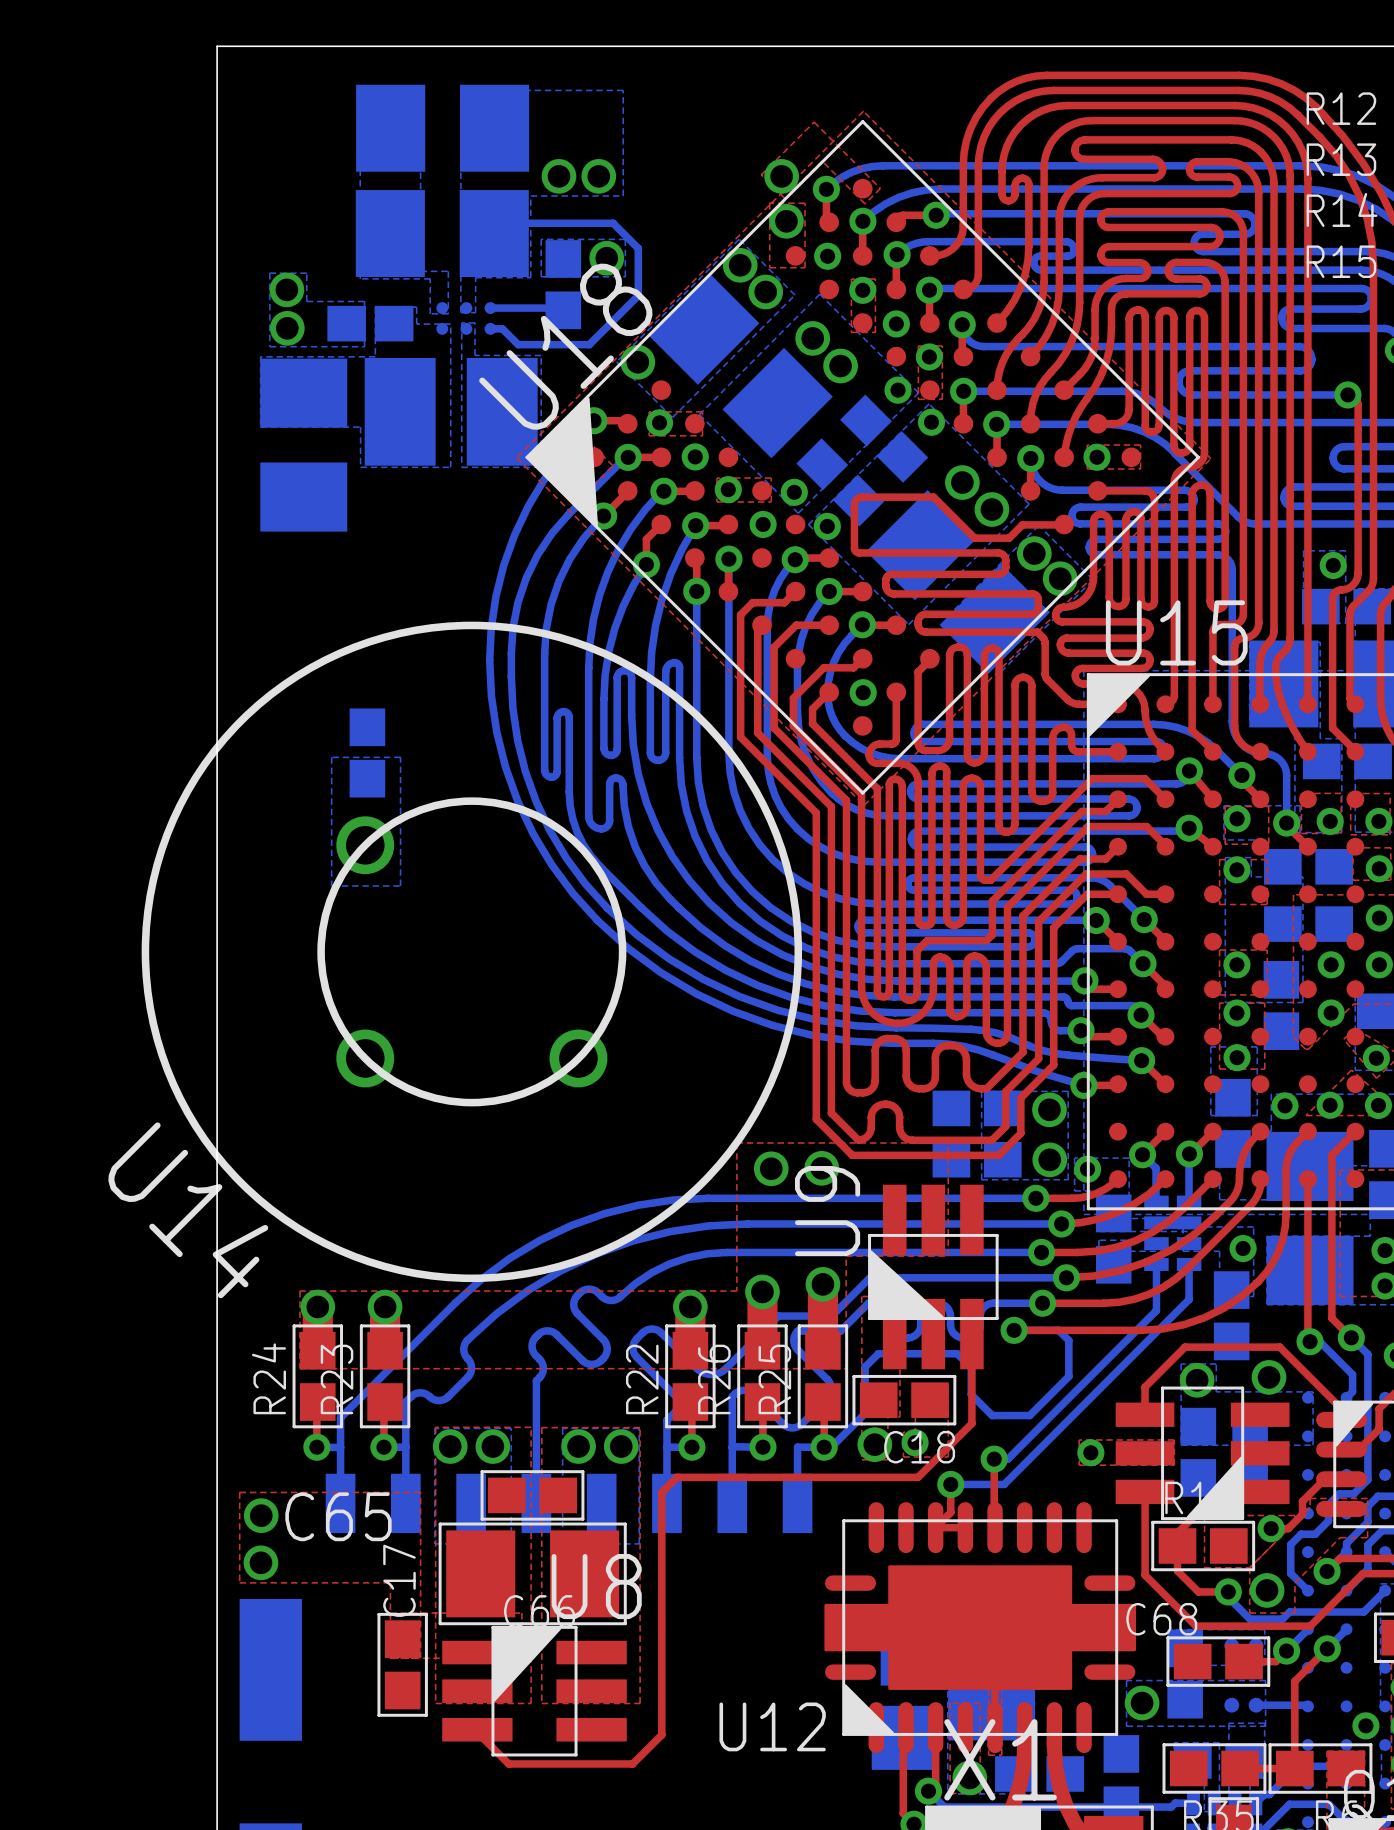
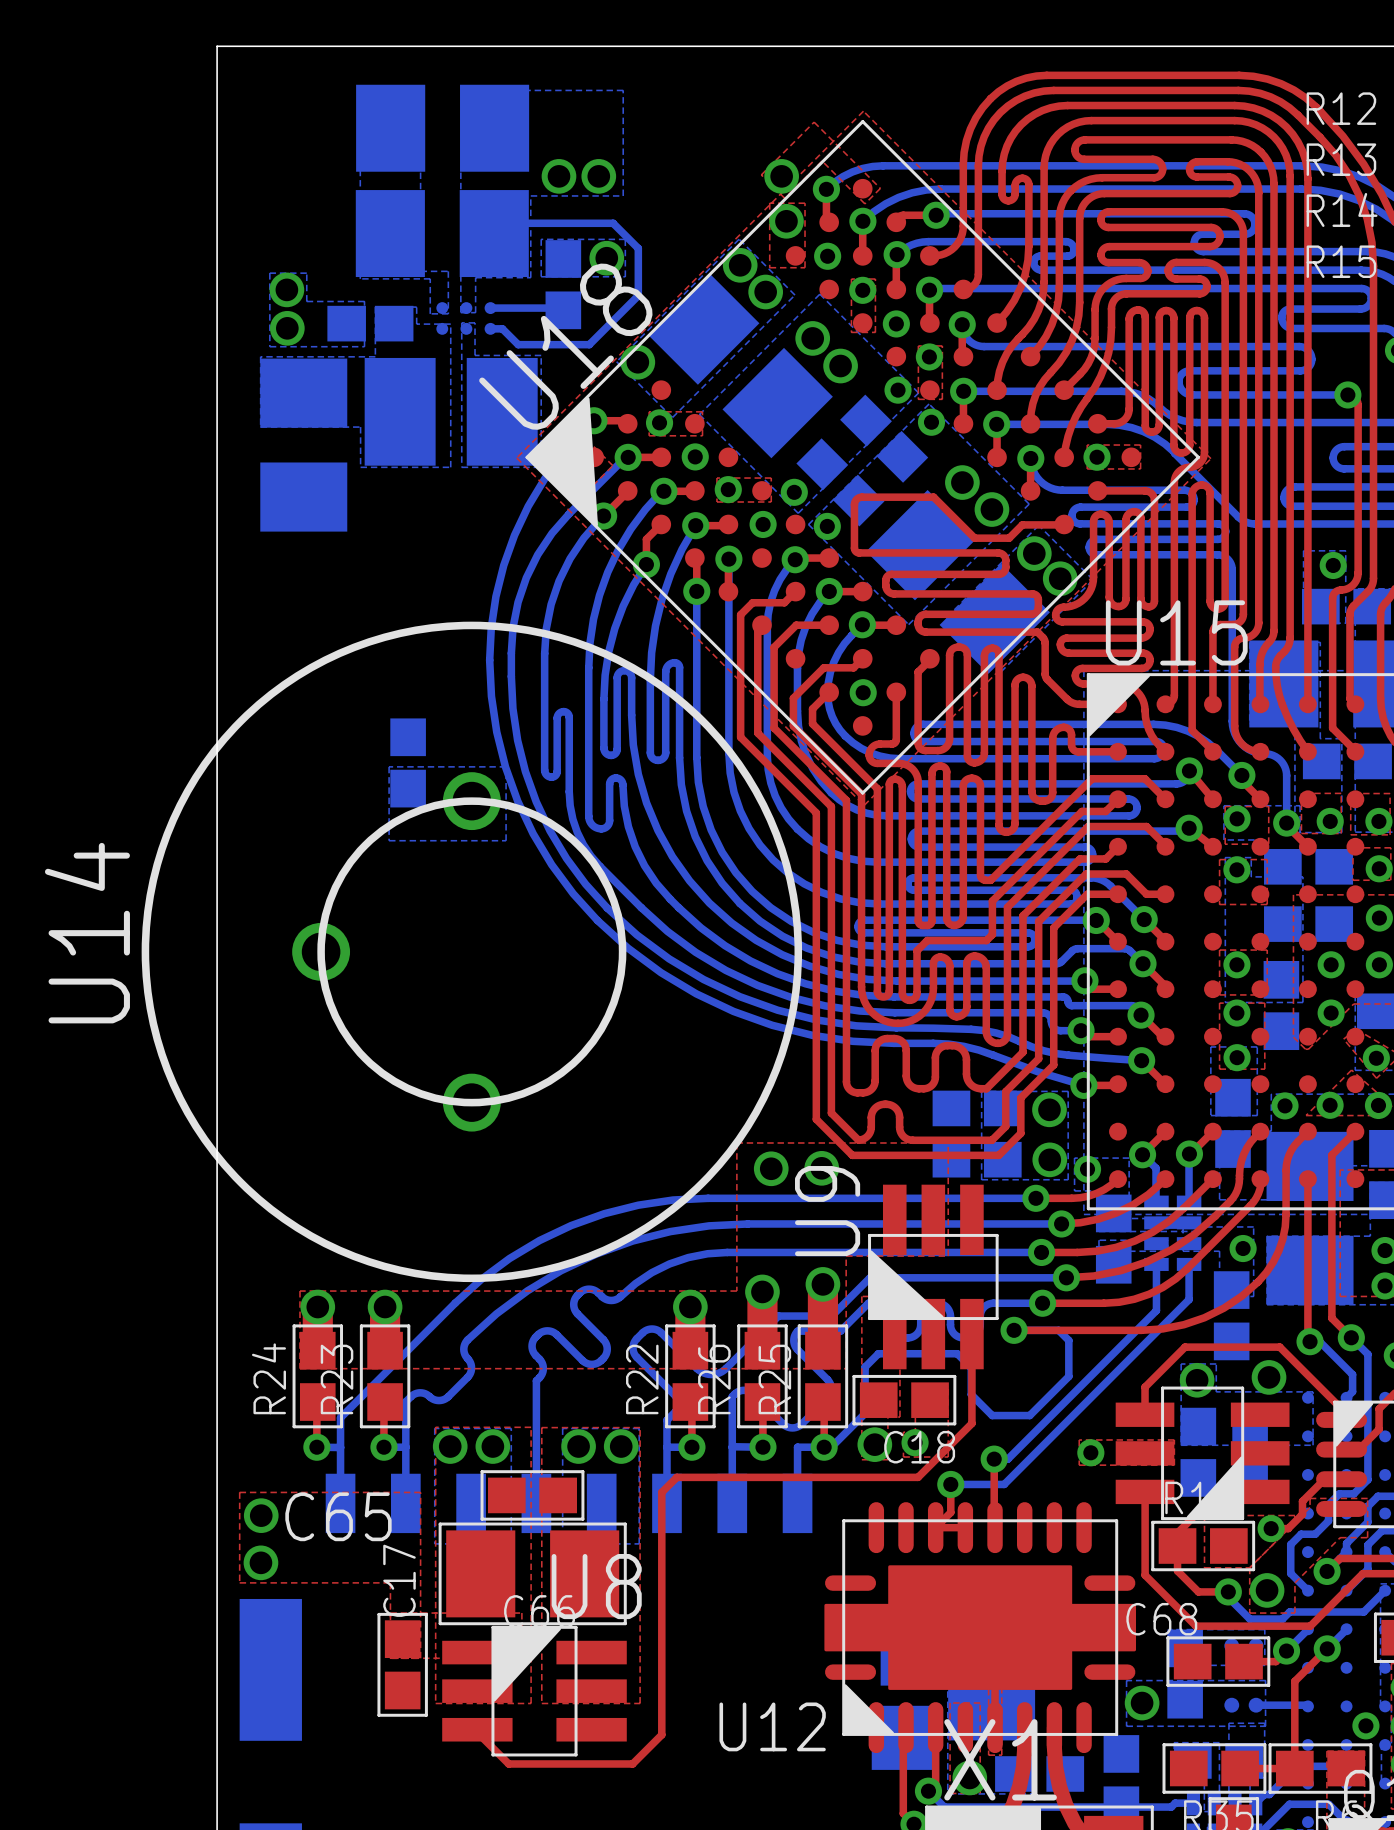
part position: (367, 752) -> (408, 762)
bottom zone outline: (331, 757) (400, 757) (400, 885) (331, 885) (331, 757) -> none
bottom zone outline: none -> (389, 766) (506, 766) (506, 840) (389, 840) (389, 766)
U14 rotation: 0° (471, 951) -> 45° clockwise (471, 951)

